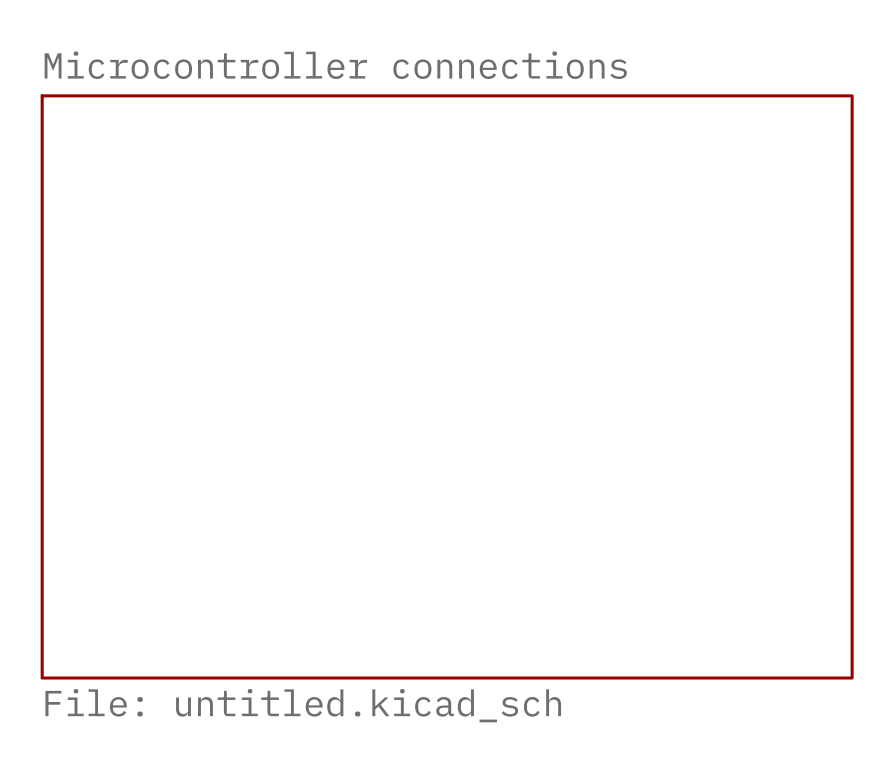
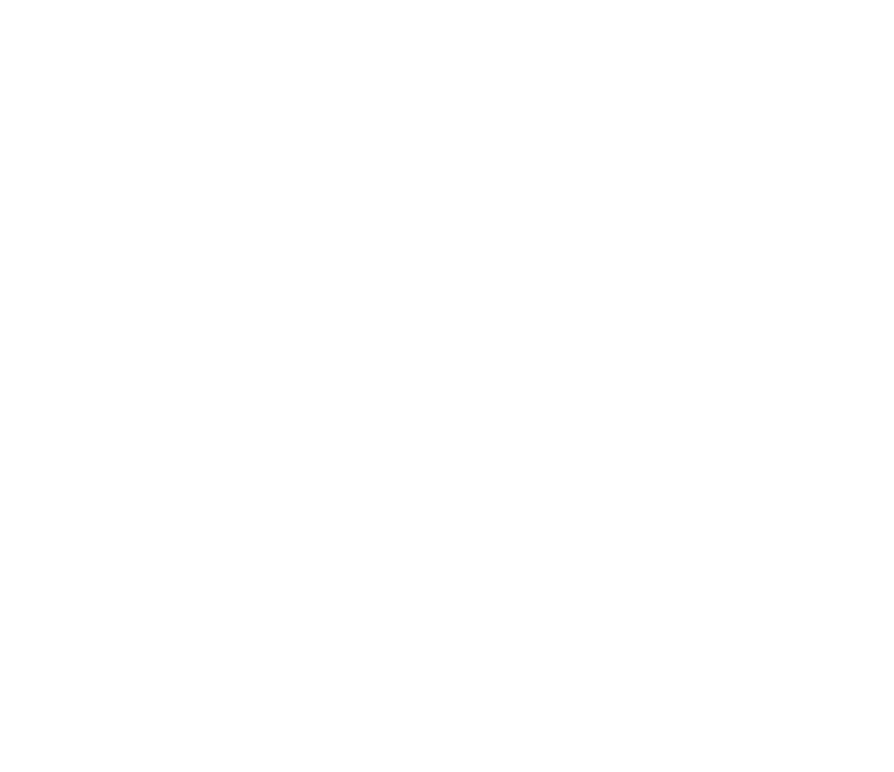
sheet Microcontroller connections: File: untitled.kicad_sch (447, 386) -> none

